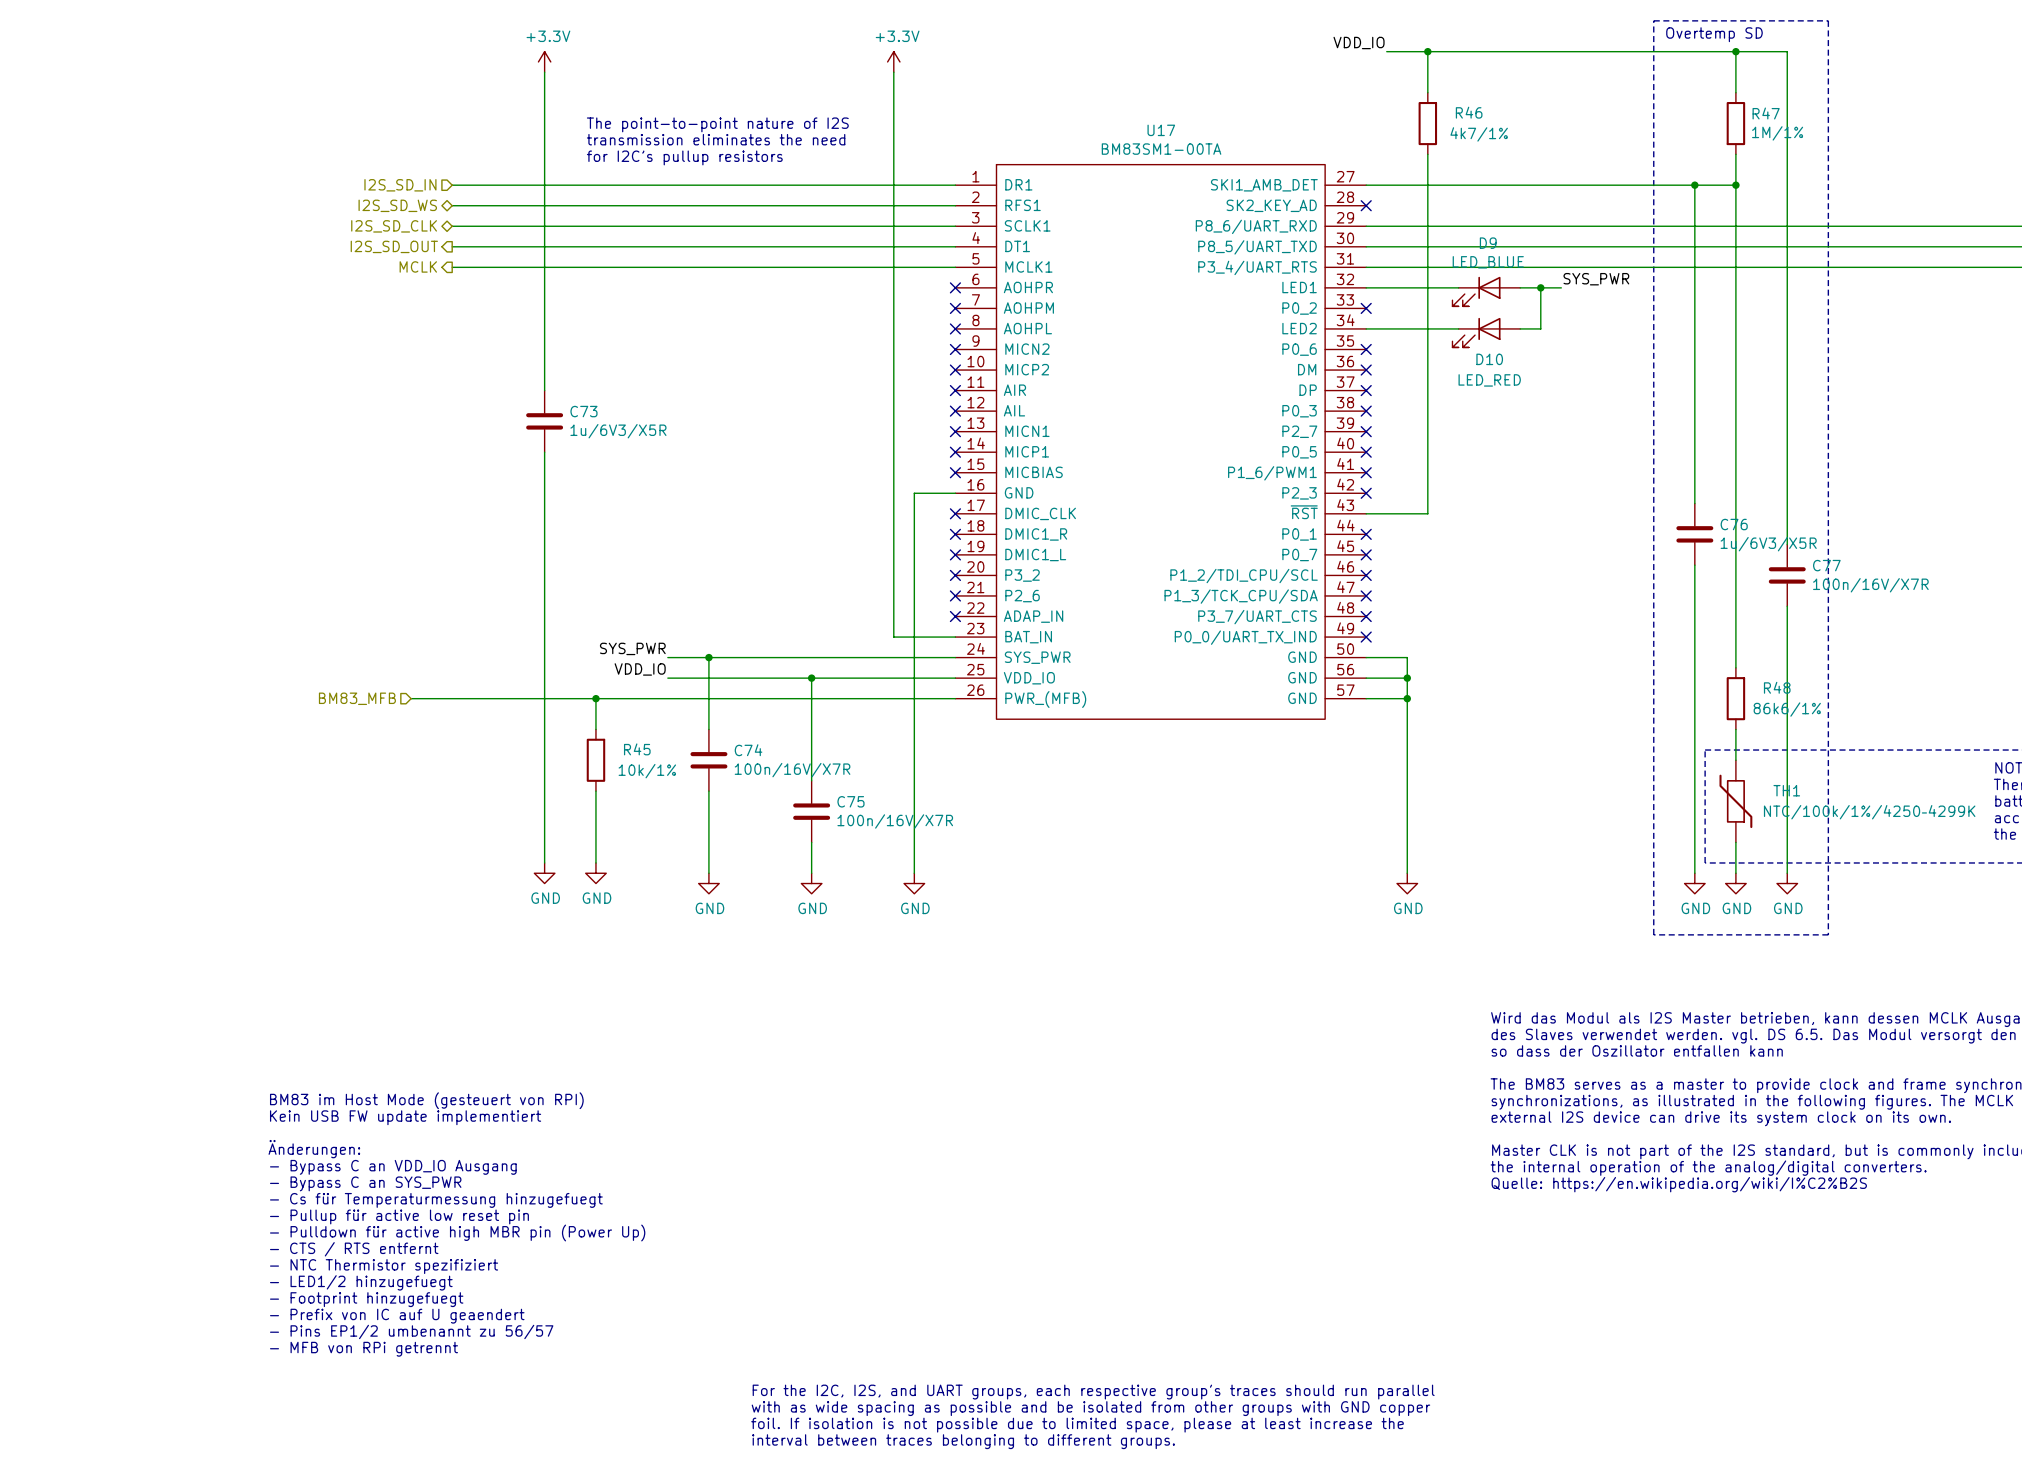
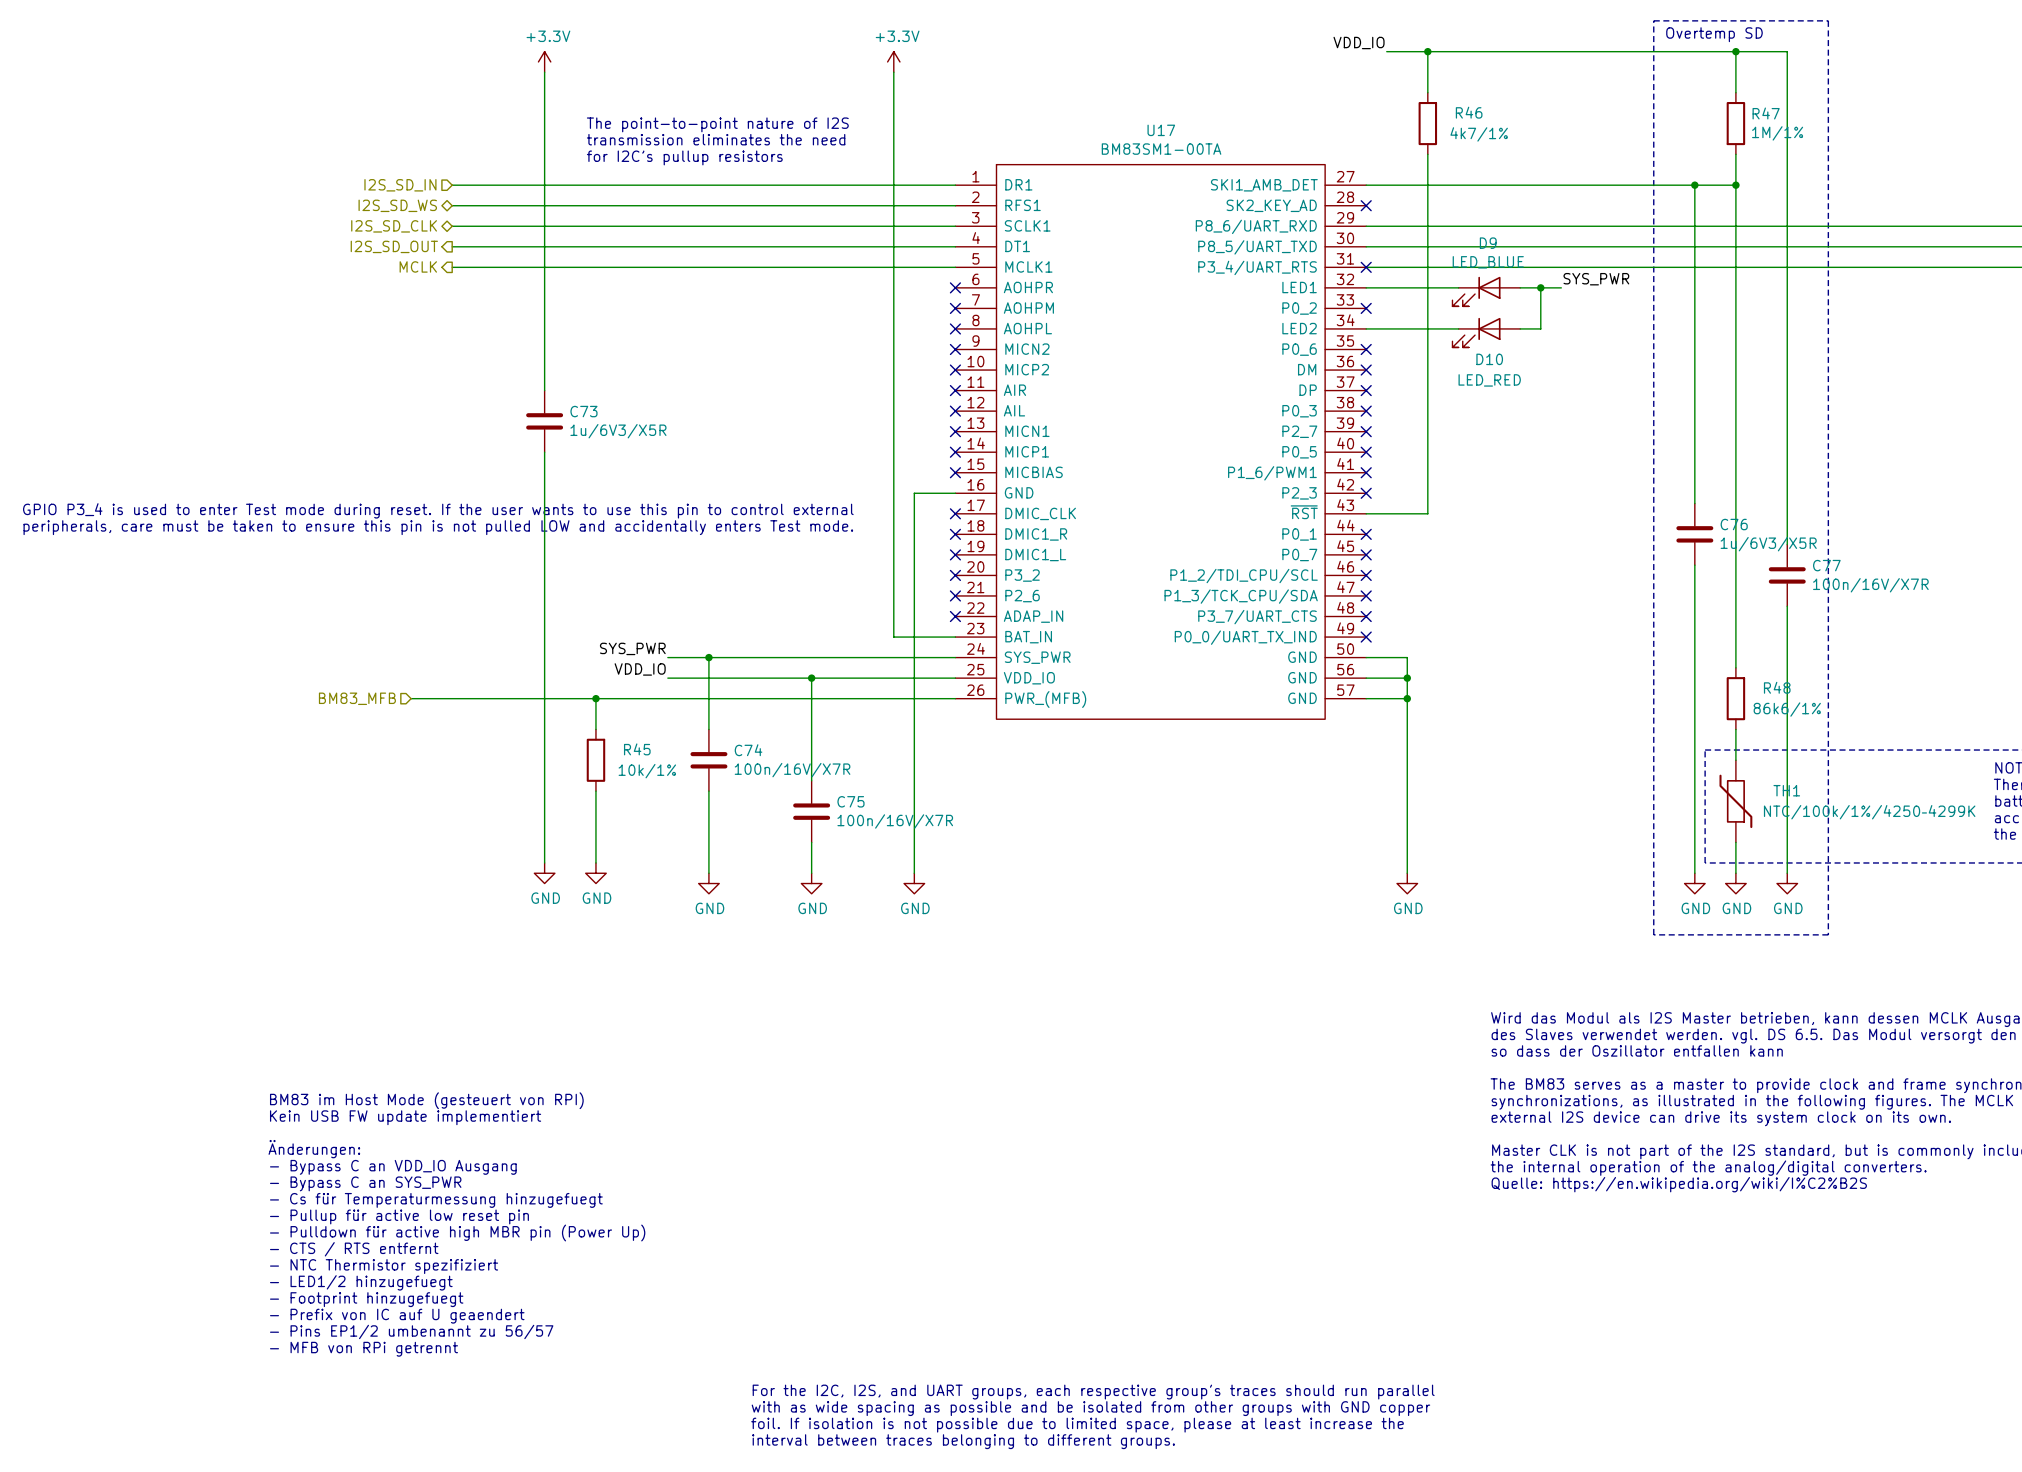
no-connect mark: none -> (1366, 267)
text: none -> GPIO P3_4 is used to enter Test mode during reset. If the user wants to use this pin to control external (438, 510)
text: none -> peripherals, care must be taken to ensure this pin is not pulled LOW and accidentally enters Test mode. (438, 527)

